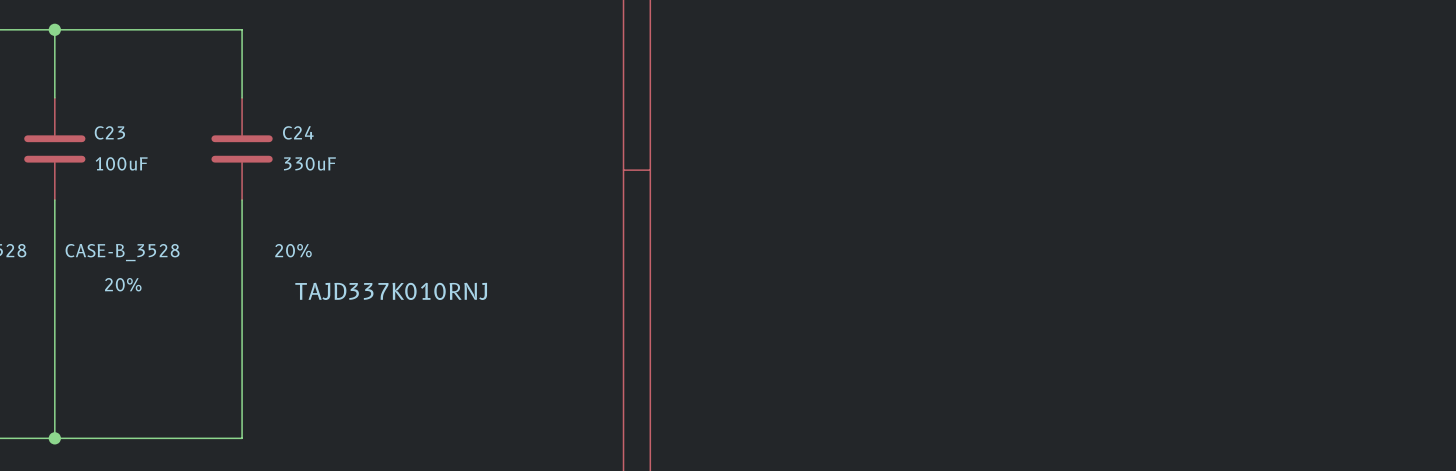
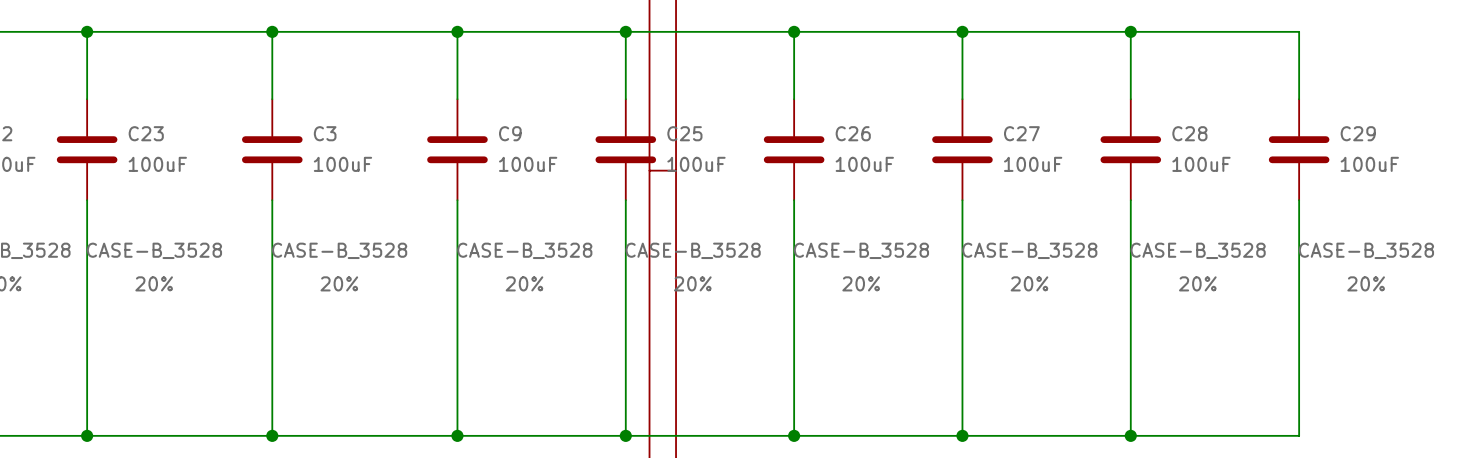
wire: none -> (272, 31) (1299, 31) (1299, 99)
junction: none -> (272, 31)
wire: none -> (457, 31) (457, 99)
junction: none -> (457, 31)
wire: none -> (625, 31) (625, 99)
junction: none -> (625, 31)
wire: none -> (794, 31) (794, 99)
junction: none -> (794, 31)
wire: none -> (962, 31) (962, 99)
junction: none -> (962, 31)
wire: none -> (1130, 31) (1130, 99)
junction: none -> (1130, 31)
C24 name: C24 (298, 132) -> C3 (325, 133)
C9: none -> 100uF (457, 149)
C25: none -> 100uF (625, 149)
C26: none -> 100uF (794, 149)
C27: none -> 100uF (962, 149)
C28: none -> 100uF (1130, 149)
C29: none -> 100uF (1299, 149)
C24 value: 330uF (309, 163) -> 100uF (342, 164)
wire: none -> (457, 200) (457, 435)
wire: none -> (625, 200) (625, 435)
wire: none -> (794, 200) (794, 435)
wire: none -> (962, 200) (962, 435)
wire: none -> (1130, 200) (1130, 435)
wire: none -> (1299, 200) (1299, 435) (272, 435)
C24 text position: 20% (293, 250) -> 20% (339, 283)
C24 text: none -> CASE-B_3528 (339, 250)
C24 text: TAJD337K010RNJ (391, 291) -> none
junction: none -> (272, 435)
junction: none -> (457, 435)
junction: none -> (625, 435)
junction: none -> (794, 435)
junction: none -> (962, 435)
junction: none -> (1130, 435)

